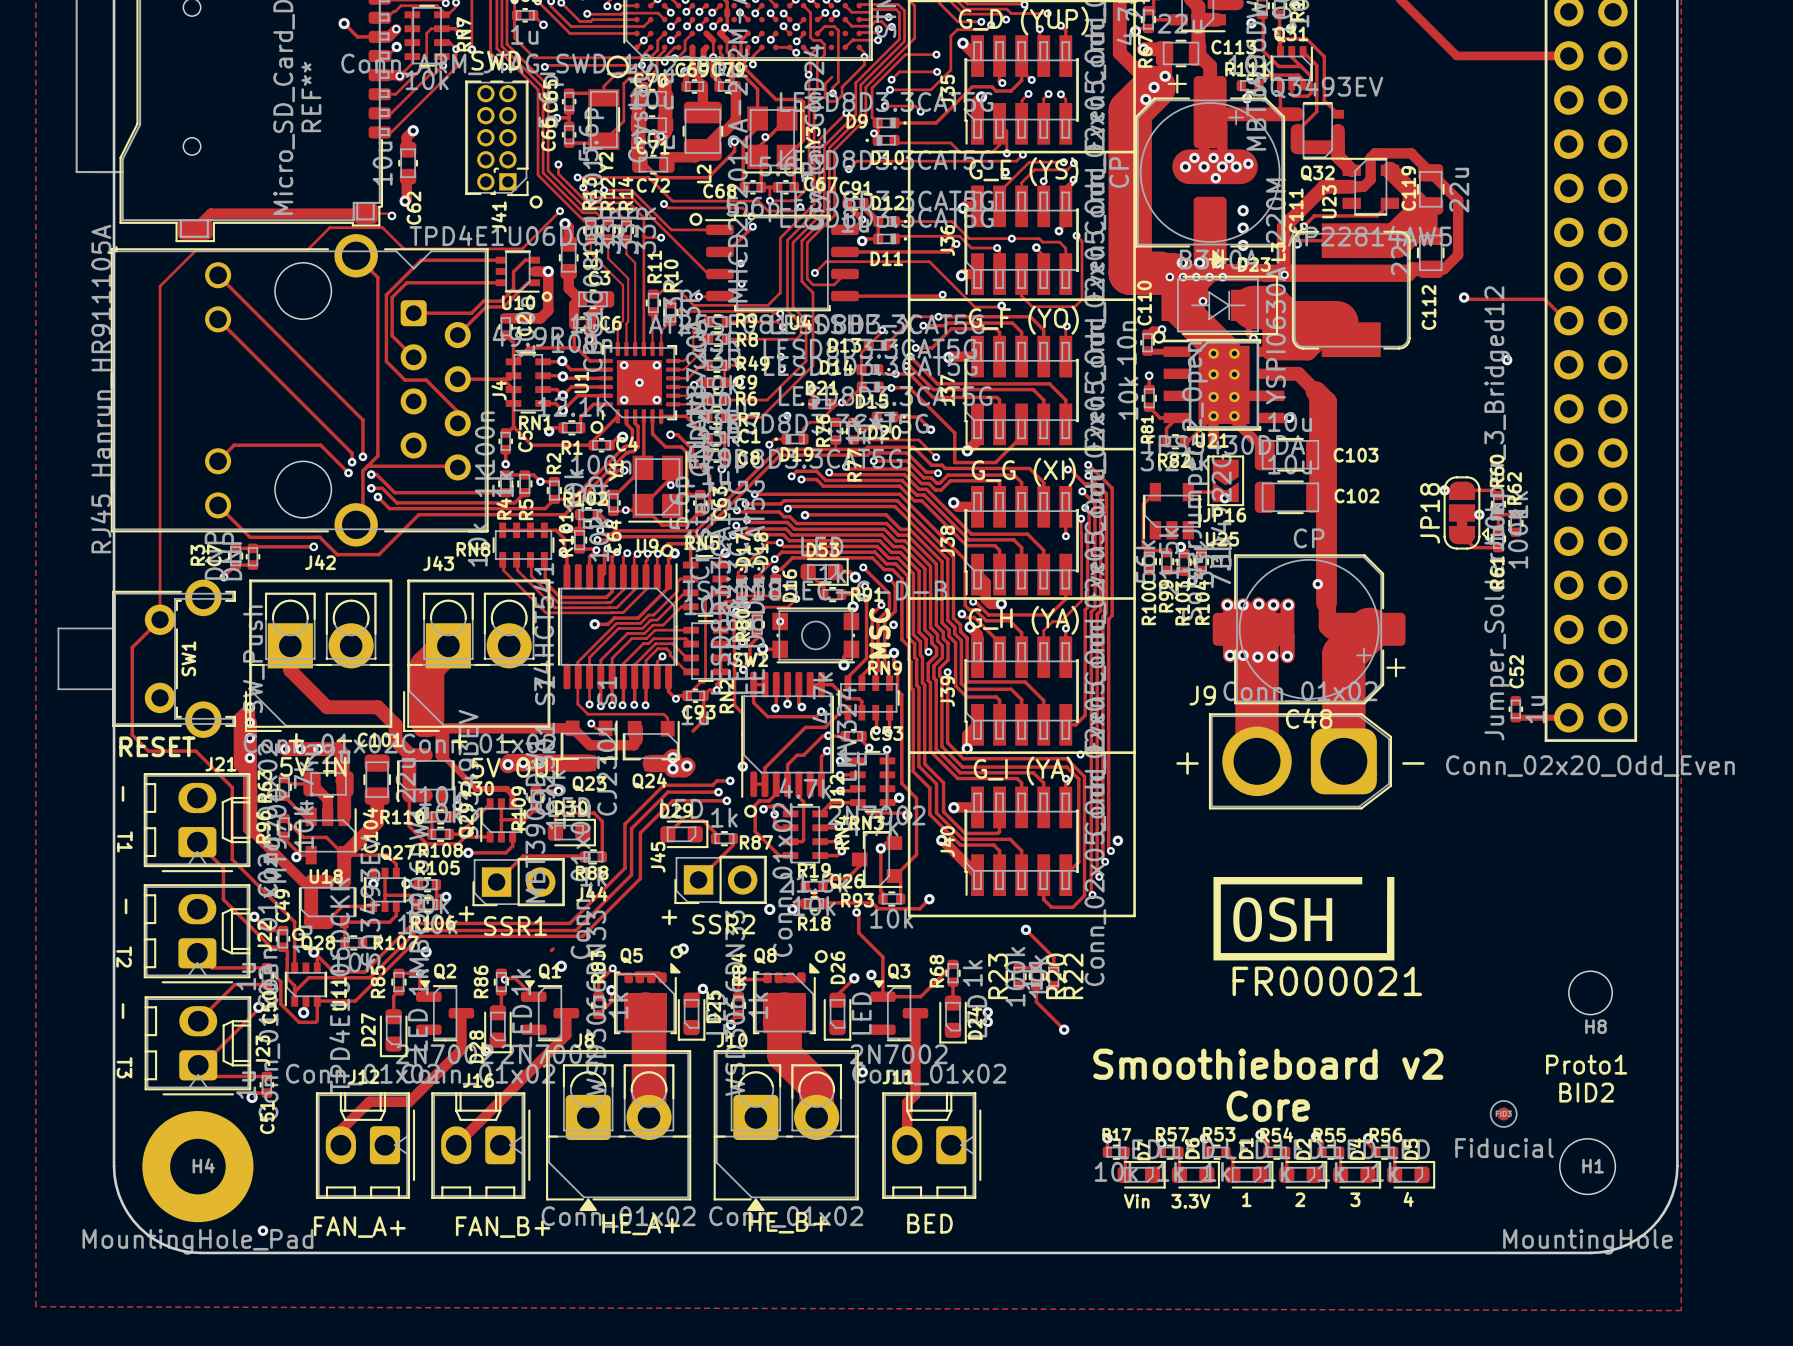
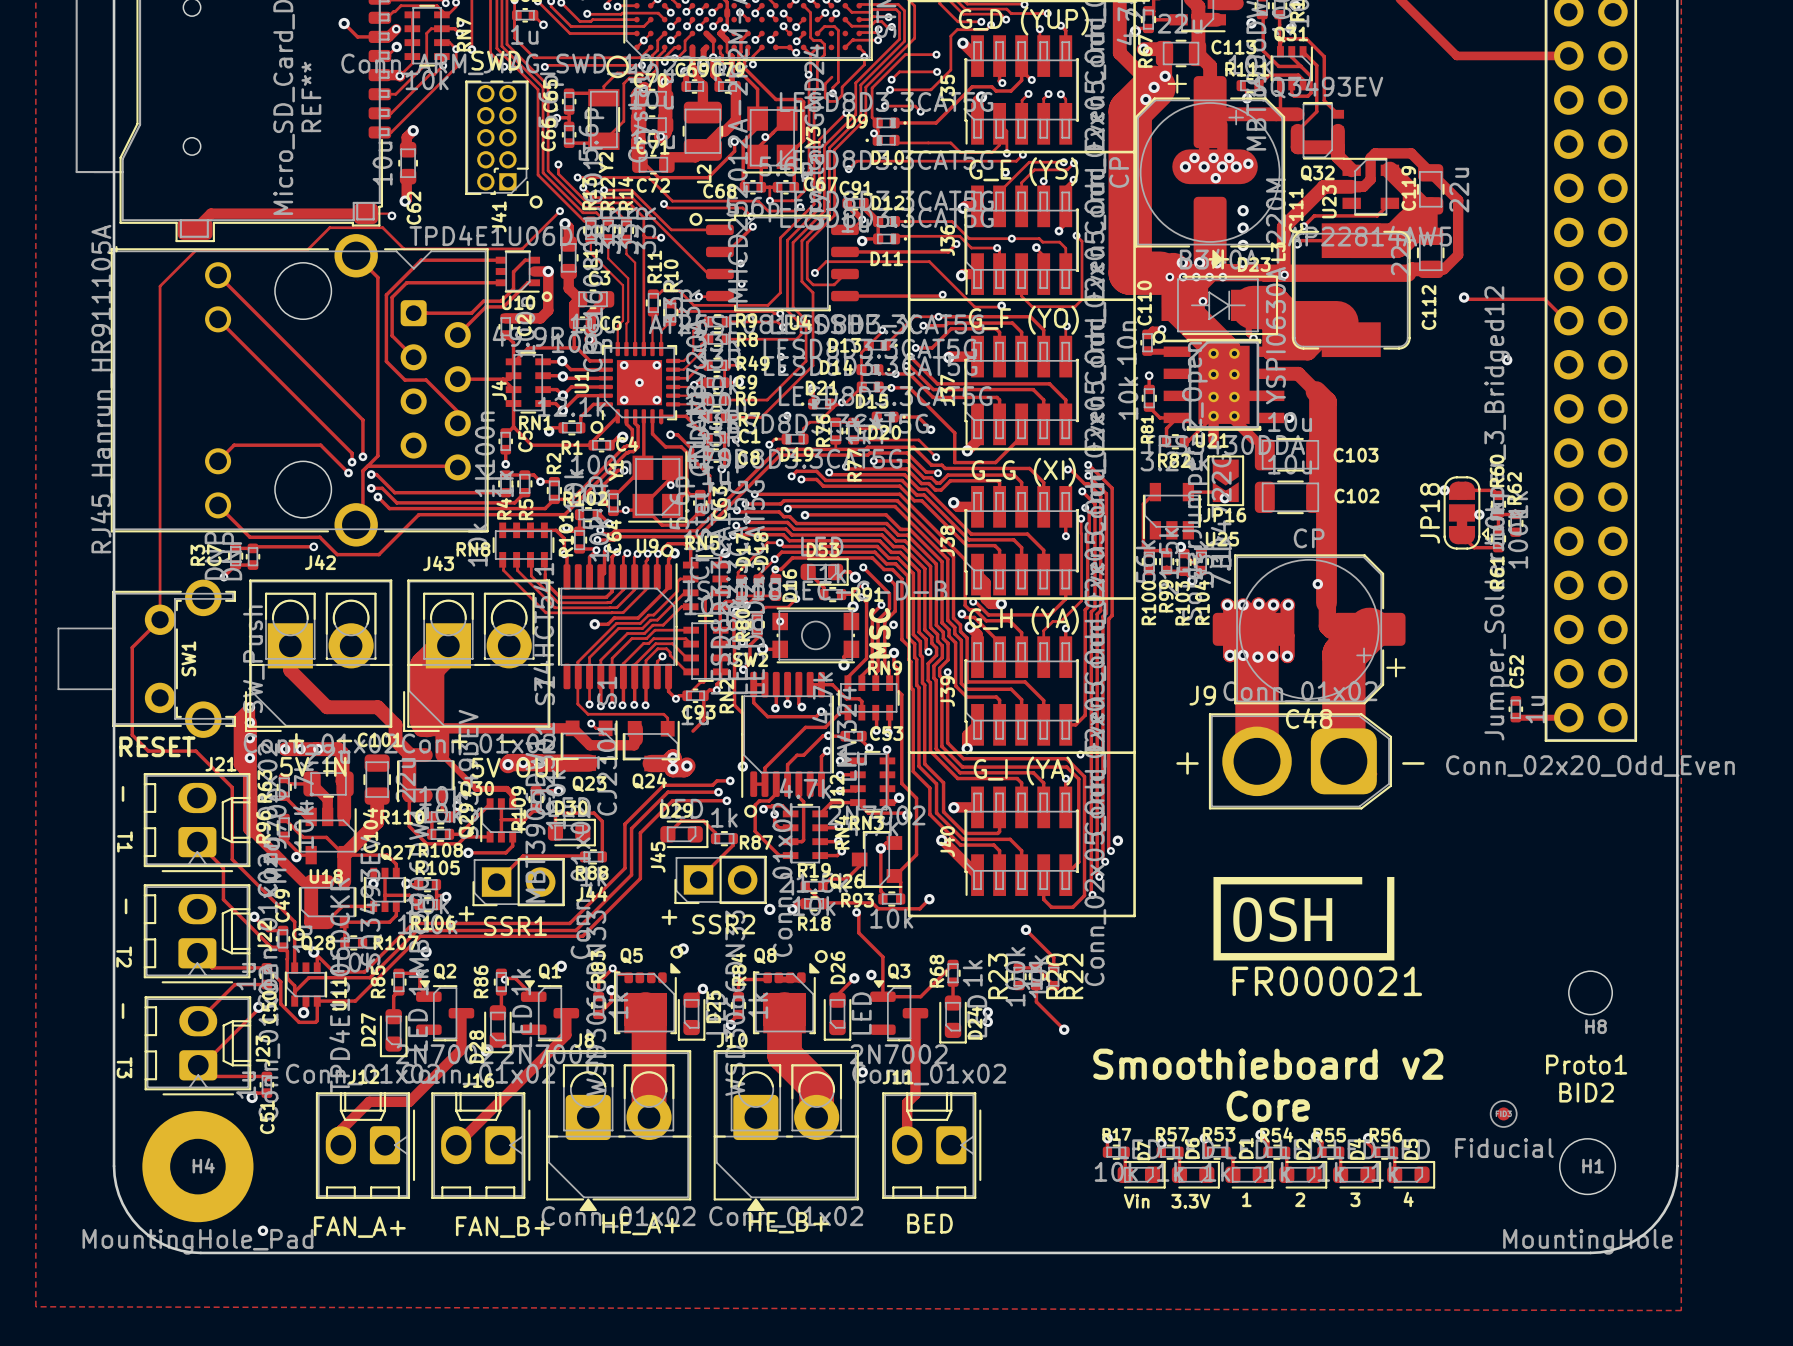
track: (553, 948) (551, 950) -> none
track: (636, 974) (658, 974) -> none

